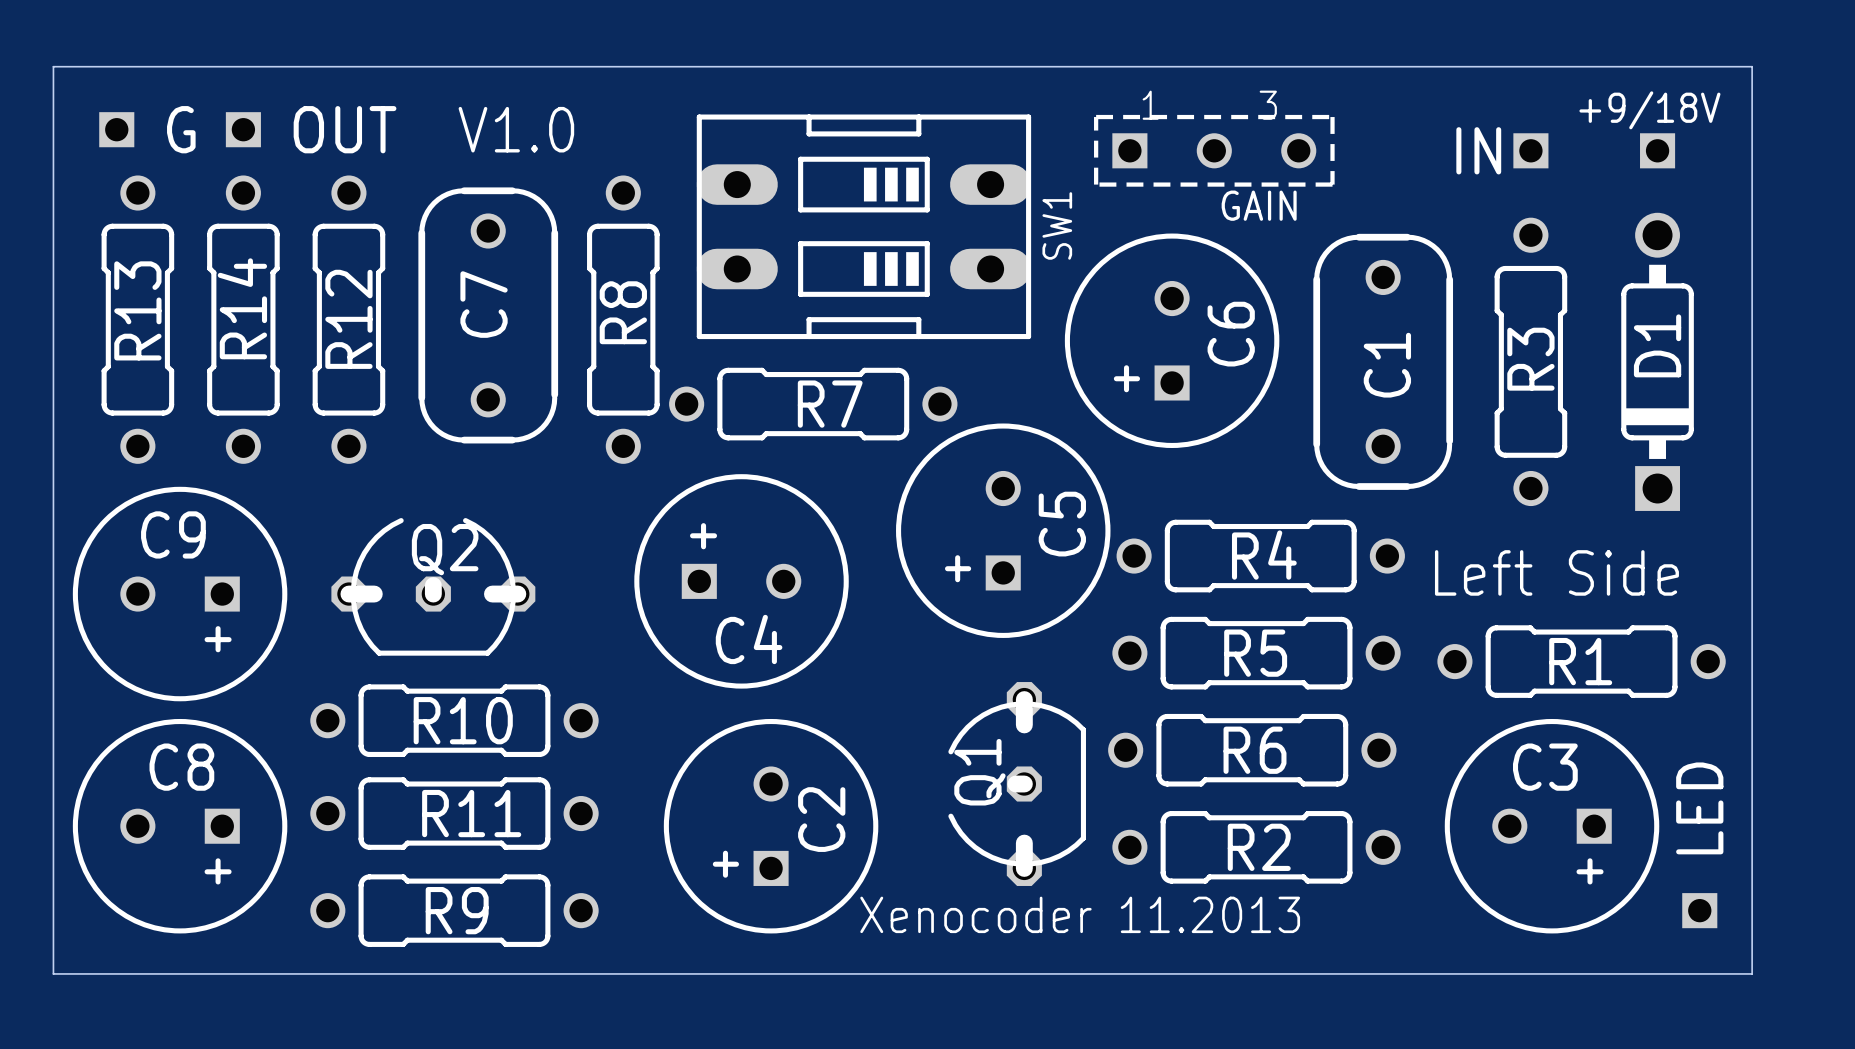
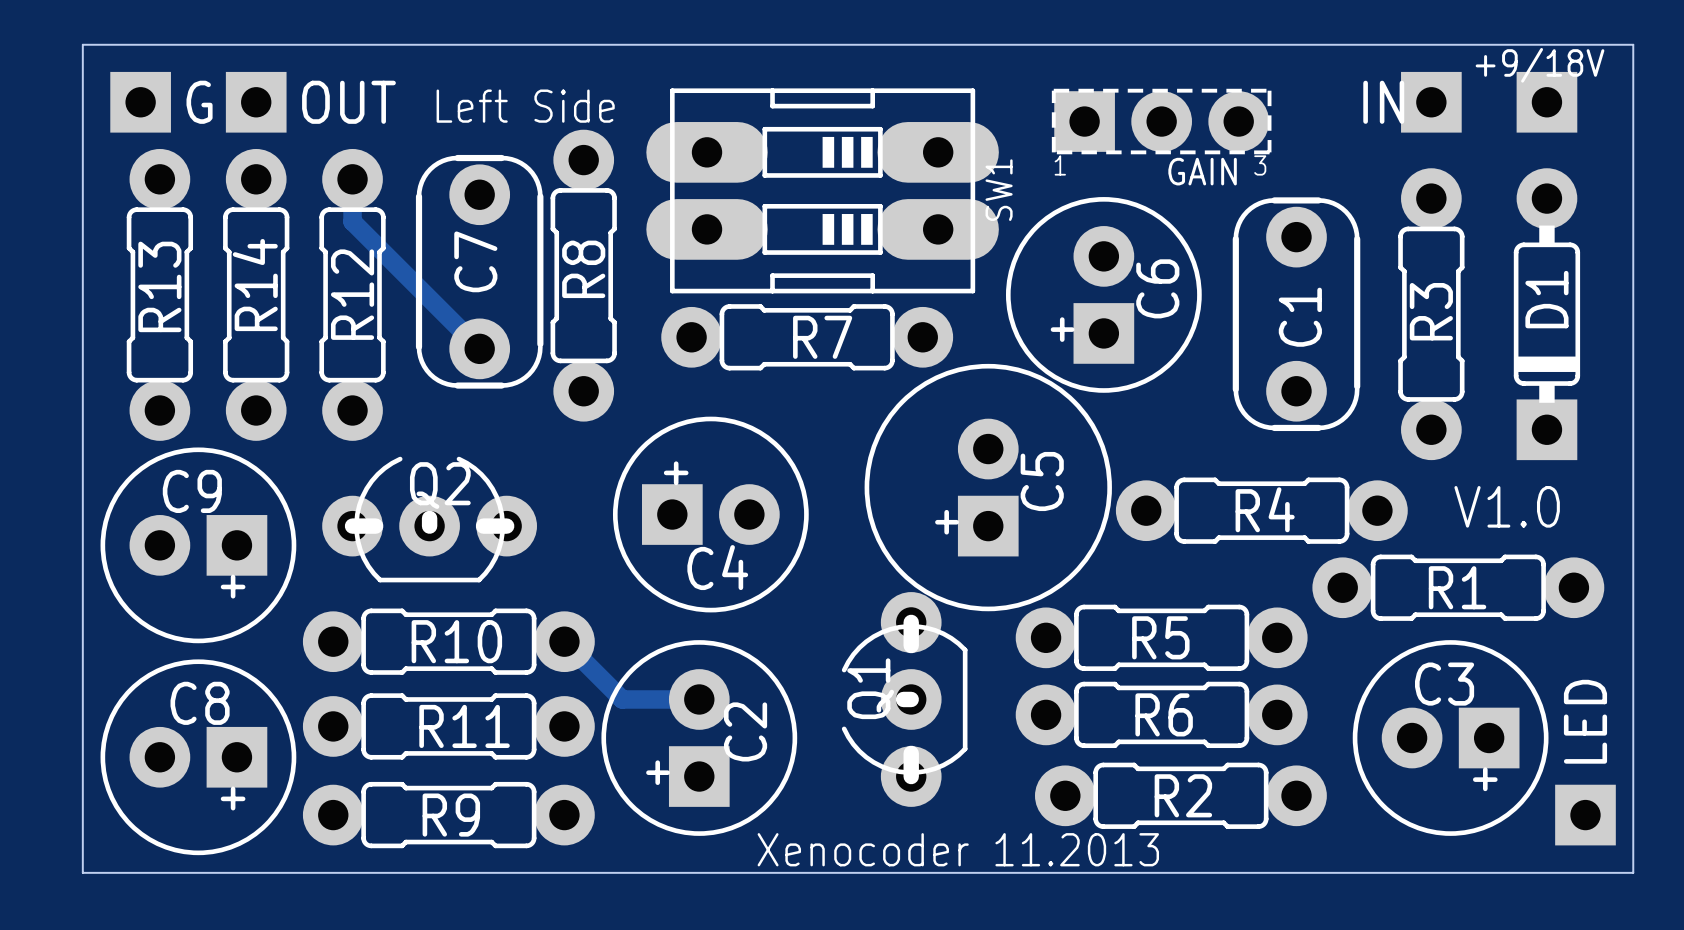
G footprint: [99, 112, 135, 148] -> [110, 71, 171, 133]
OUT footprint: [225, 112, 261, 148] -> [225, 71, 287, 133]
SW1 footprint: [696, 114, 1032, 340] -> [646, 88, 999, 294]
GAIN footprint: [1094, 114, 1335, 187] -> [1051, 88, 1272, 155]
text: V1.0 (516, 129) -> Left Side (525, 106)
IN footprint: [1513, 133, 1549, 169] -> [1401, 71, 1462, 133]
+9/18V footprint: [1640, 133, 1676, 169] -> [1516, 71, 1578, 133]
R13 footprint: [101, 175, 175, 464] -> [126, 148, 194, 441]
R14 footprint: [207, 175, 280, 464] -> [223, 148, 290, 441]
R12 footprint: [312, 175, 386, 464] -> [319, 148, 386, 441]
R8 footprint: [587, 175, 660, 464] -> [550, 129, 617, 422]
C7 footprint: [418, 187, 559, 444] -> [415, 154, 544, 389]
D1 footprint: [1621, 212, 1694, 511] -> [1513, 168, 1581, 461]
track: none -> (352, 179) (352, 221) (479, 348)
R3 footprint: [1494, 217, 1568, 507] -> [1398, 168, 1465, 461]
C6 footprint: [1064, 233, 1280, 449] -> [1005, 197, 1202, 393]
C1 footprint: [1313, 233, 1454, 490] -> [1232, 197, 1361, 432]
R7 footprint: [669, 367, 958, 441] -> [661, 304, 954, 371]
C5 footprint: [896, 423, 1111, 638] -> [864, 363, 1112, 612]
C4 footprint: [634, 474, 849, 689] -> [612, 416, 809, 613]
C9 footprint: [72, 486, 288, 702] -> [100, 447, 297, 644]
Q2 footprint: [331, 518, 536, 656] -> [322, 456, 537, 583]
R4 footprint: [1116, 519, 1405, 593] -> [1115, 477, 1408, 544]
text: Left Side (1556, 572) -> none
text: none -> V1.0 (1507, 506)
R5 footprint: [1112, 616, 1401, 690] -> [1015, 604, 1308, 671]
R1 footprint: [1437, 625, 1726, 698] -> [1312, 554, 1605, 621]
Q1 footprint: [948, 682, 1086, 886] -> [841, 592, 968, 807]
R10 footprint: [310, 684, 599, 757] -> [302, 608, 595, 675]
R6 footprint: [1108, 713, 1397, 787] -> [1015, 681, 1308, 749]
C8 footprint: [72, 718, 288, 934] -> [100, 659, 297, 856]
C2 footprint: [663, 718, 879, 934] -> [601, 640, 798, 836]
C3 footprint: [1444, 718, 1660, 934] -> [1352, 640, 1549, 836]
track: none -> (564, 641) (622, 699) (699, 699)
R11 footprint: [310, 777, 599, 850] -> [302, 693, 595, 760]
R2 footprint: [1112, 811, 1401, 884] -> [1034, 762, 1327, 829]
R9 footprint: [310, 874, 599, 947] -> [302, 781, 595, 849]
LED footprint: [1682, 893, 1718, 929] -> [1555, 784, 1616, 846]
text position: Xenocoder 11.2013 (1080, 914) -> Xenocoder 11.2013 (958, 849)

